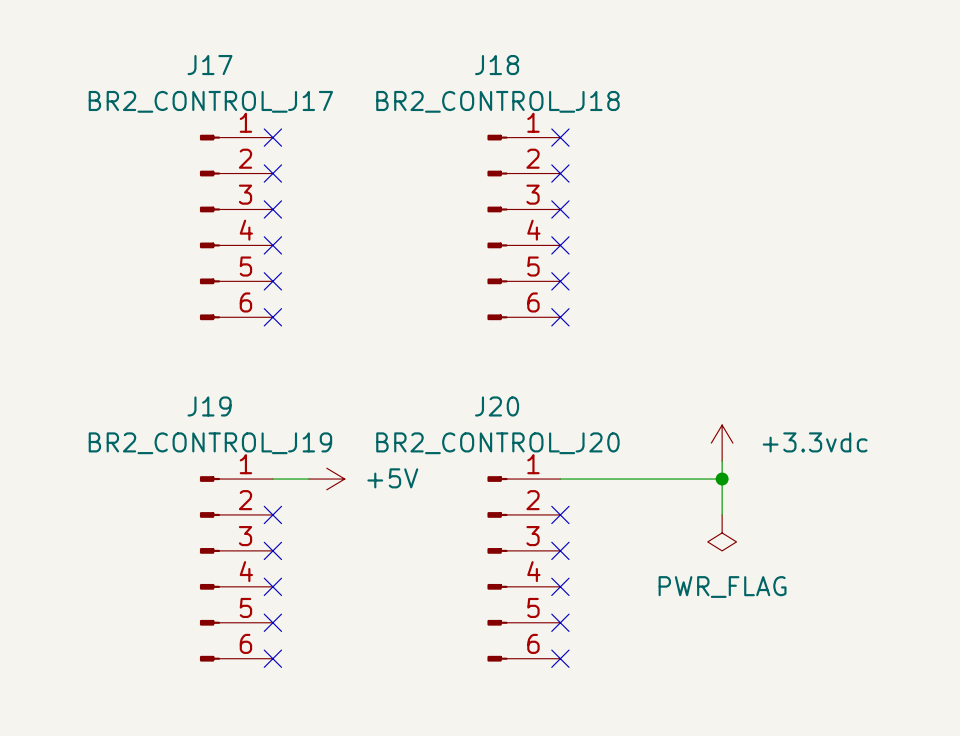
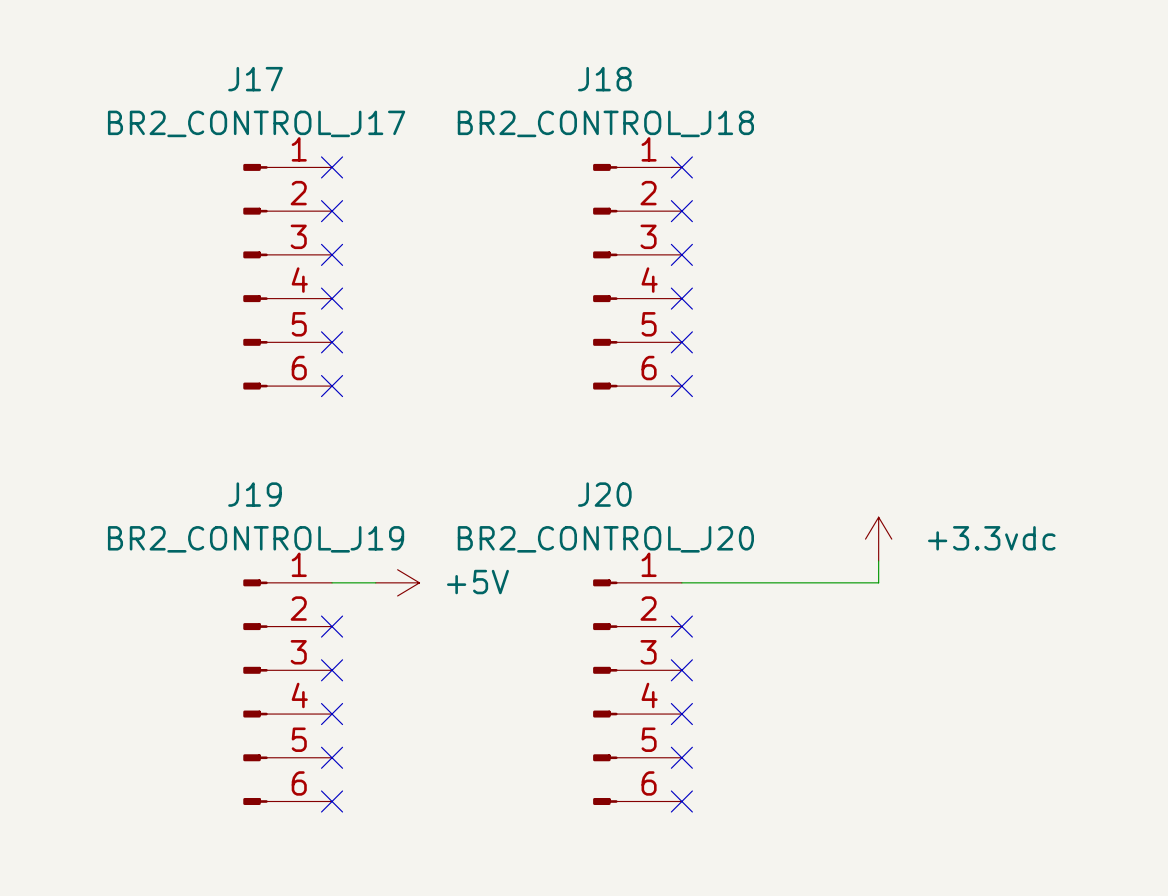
wire: (722, 479) (722, 514) -> none
junction: (722, 479) -> none
power symbol: PWR_FLAG (722, 532) -> none

